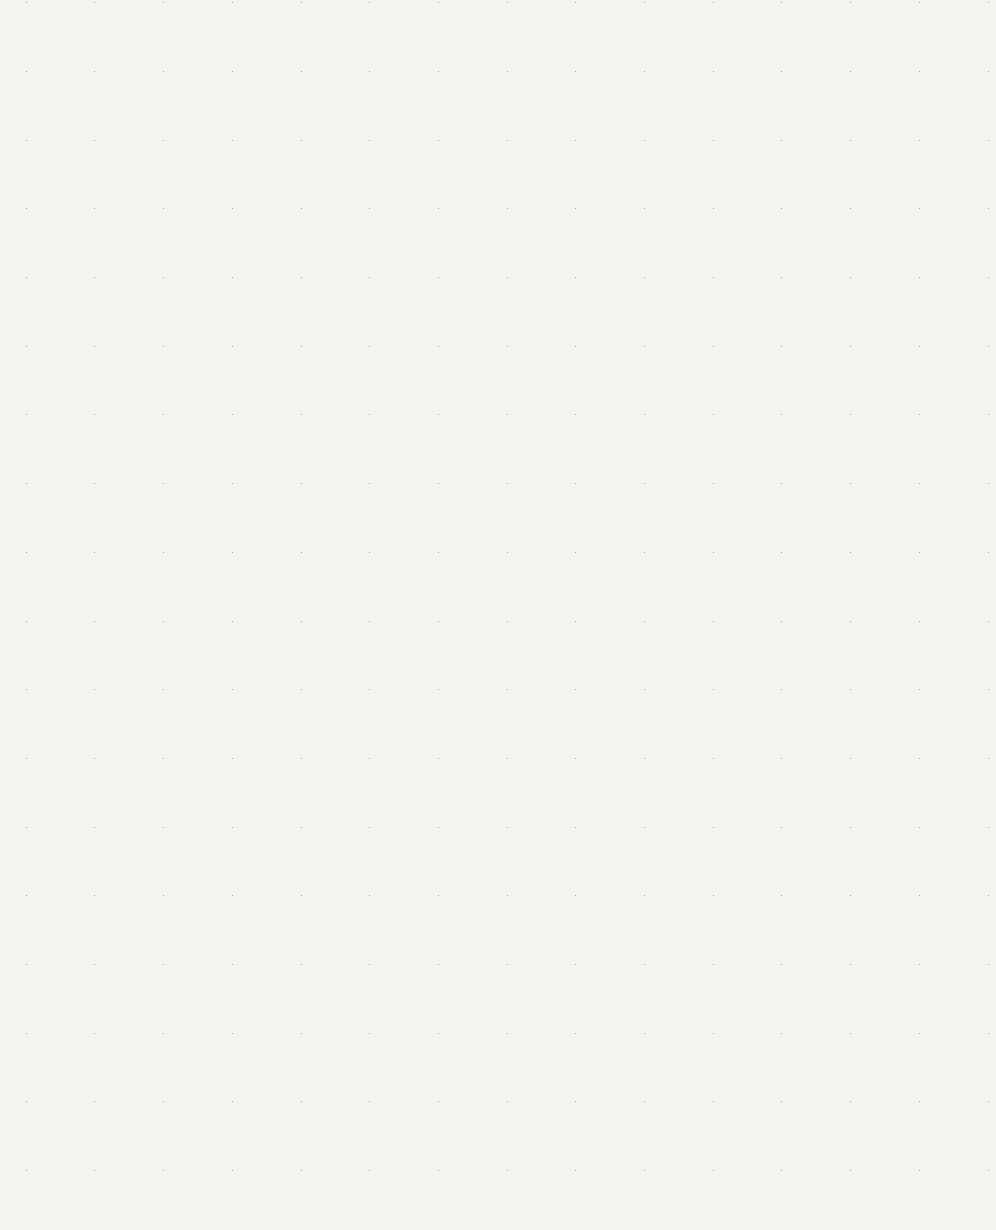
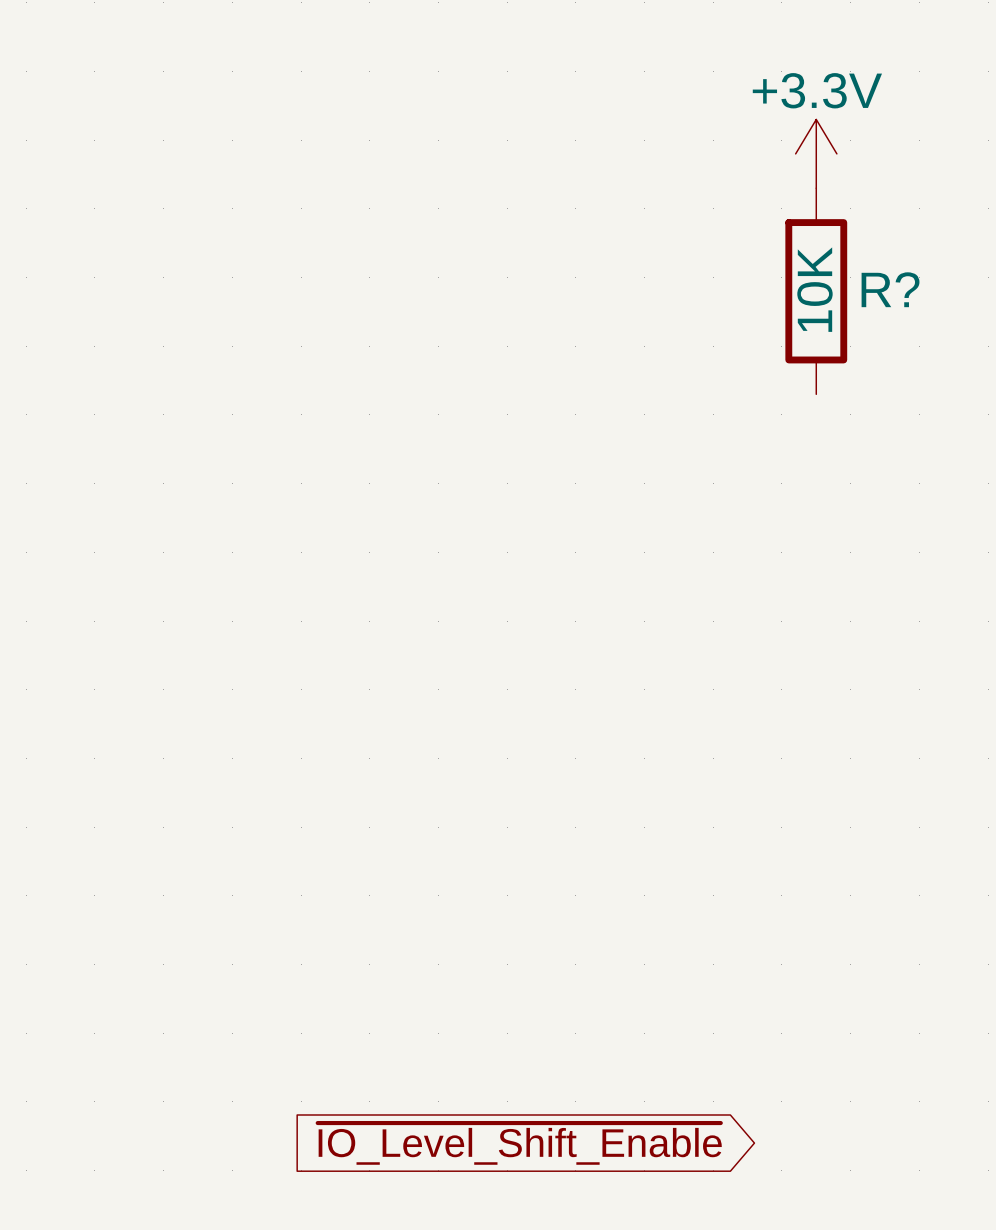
power symbol: none -> +3.3V (816, 153)
R?: none -> 10K (816, 291)
global label: none -> ~{IO_Level_Shift_Enable} (519, 1143)

